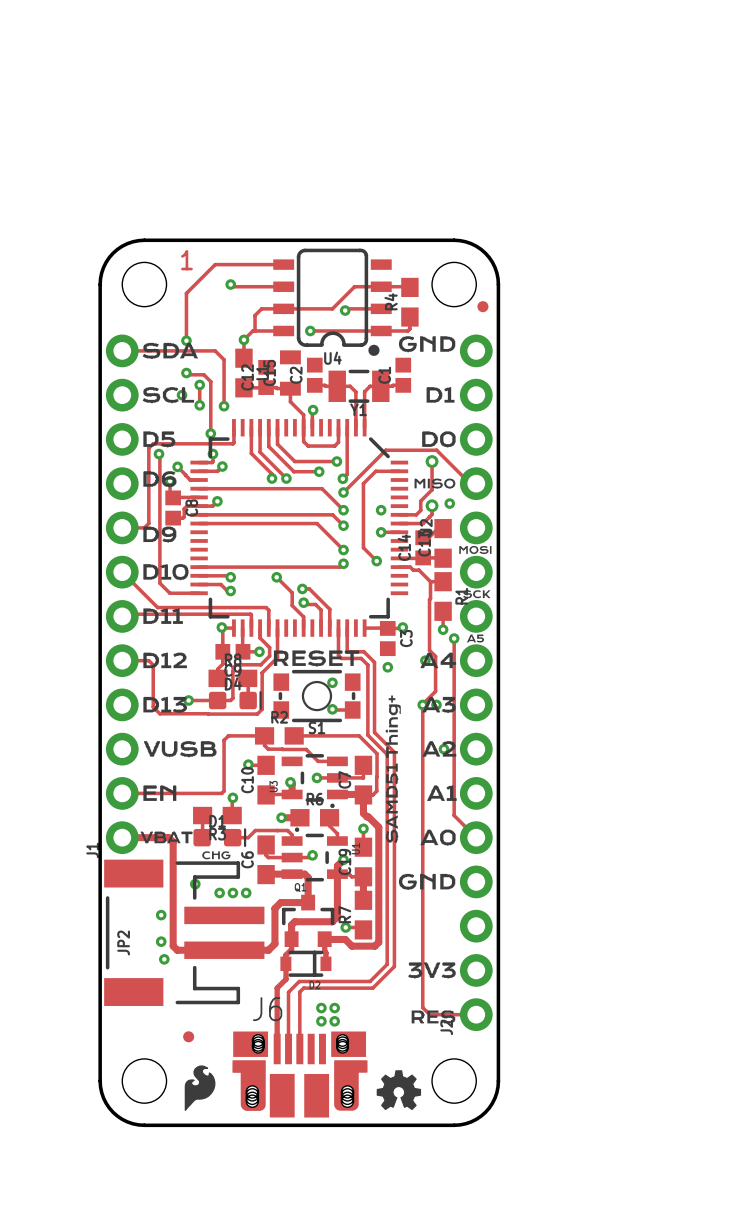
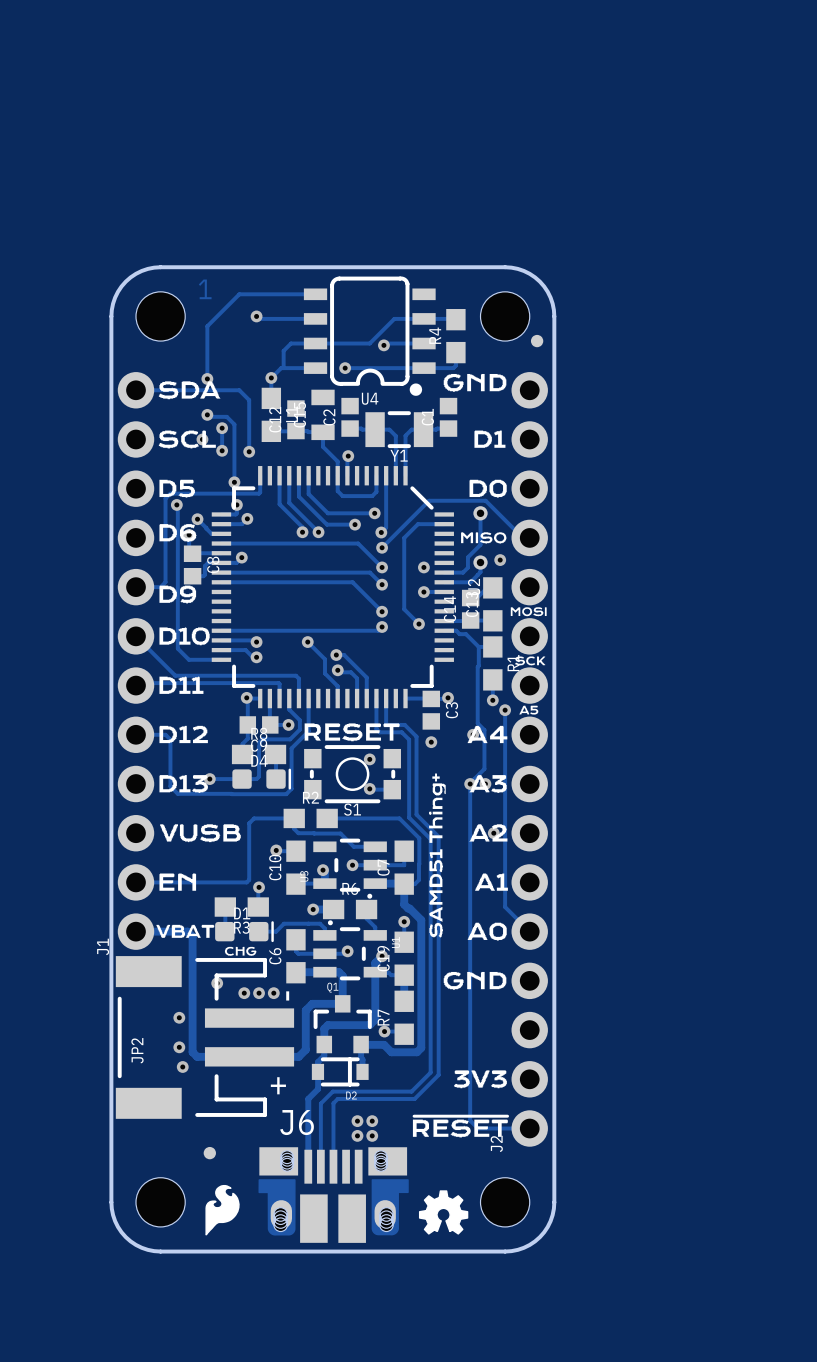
text: none -> - (287, 995)
text: none -> + (278, 1085)
line: none -> (414, 1116) (507, 1116)
drawing: none -> [412, 1119, 508, 1138]
drawing: [411, 1010, 456, 1024] -> none

